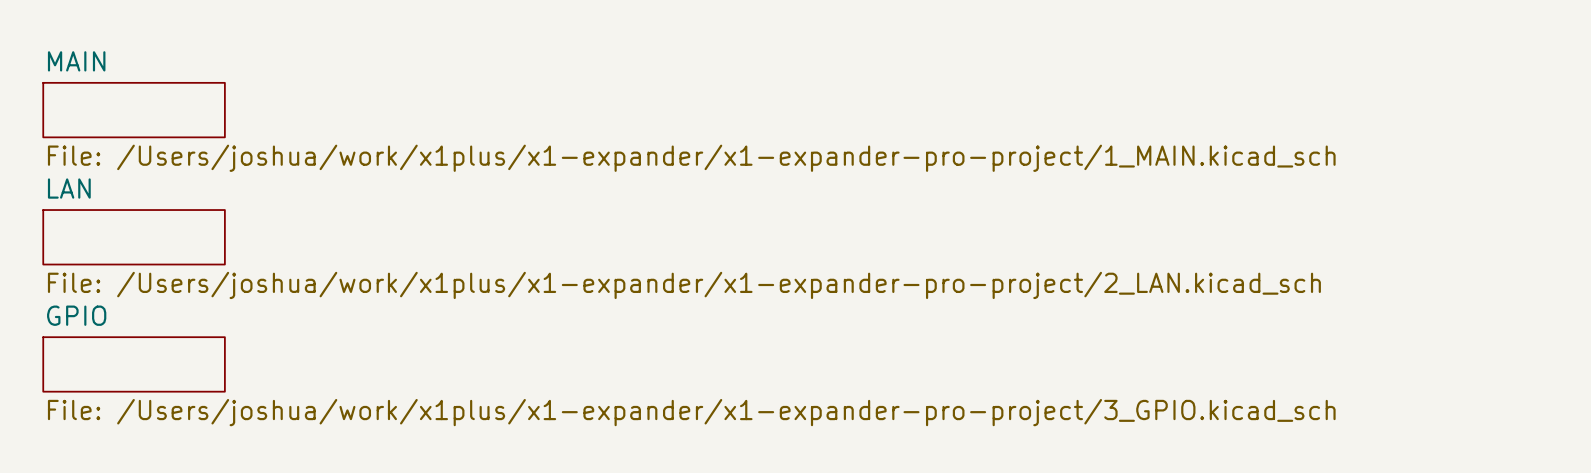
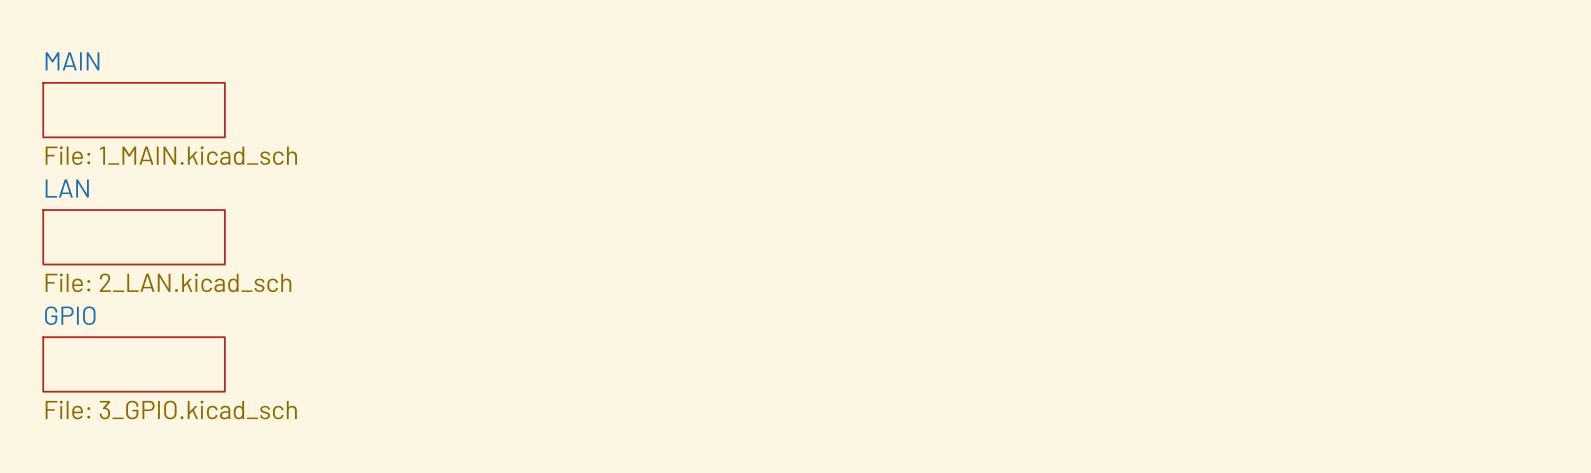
sheet MAIN value: File: /Users/joshua/work/x1plus/x1-expander/x1-expander-pro-project/1_MAIN.kicad_sch (691, 158) -> File: 1_MAIN.kicad_sch (171, 155)
sheet LAN value: File: /Users/joshua/work/x1plus/x1-expander/x1-expander-pro-project/2_LAN.kicad_sch (684, 285) -> File: 2_LAN.kicad_sch (168, 282)
sheet GPIO value: File: /Users/joshua/work/x1plus/x1-expander/x1-expander-pro-project/3_GPIO.kicad_sch (691, 412) -> File: 3_GPIO.kicad_sch (171, 409)

